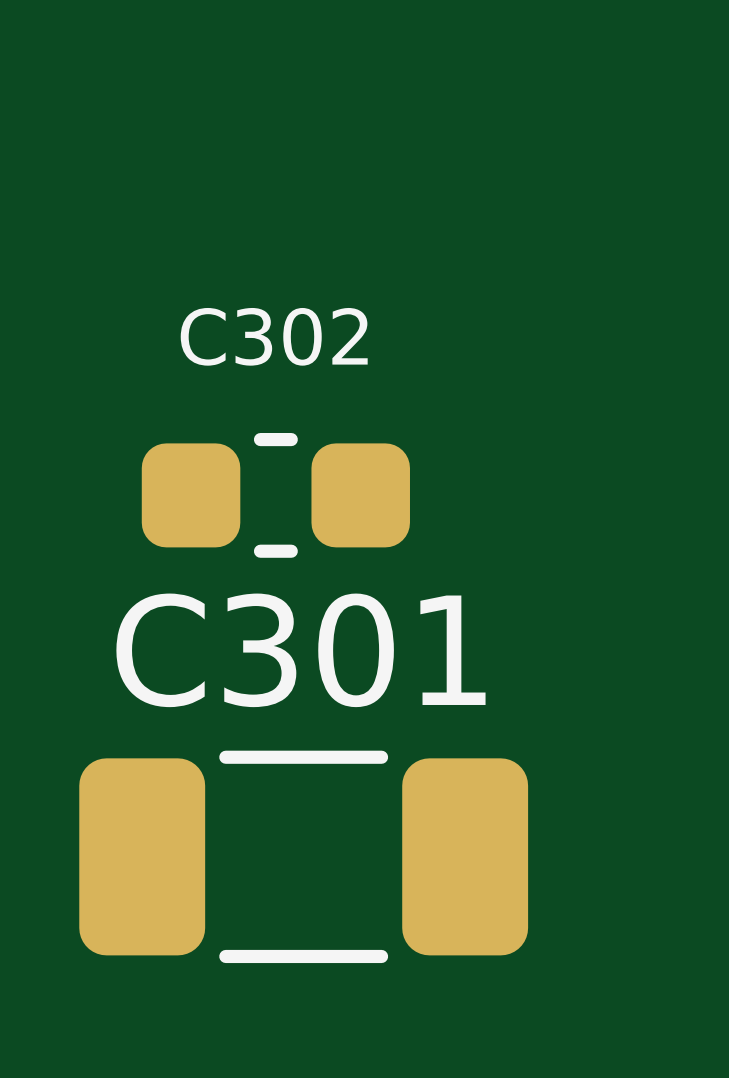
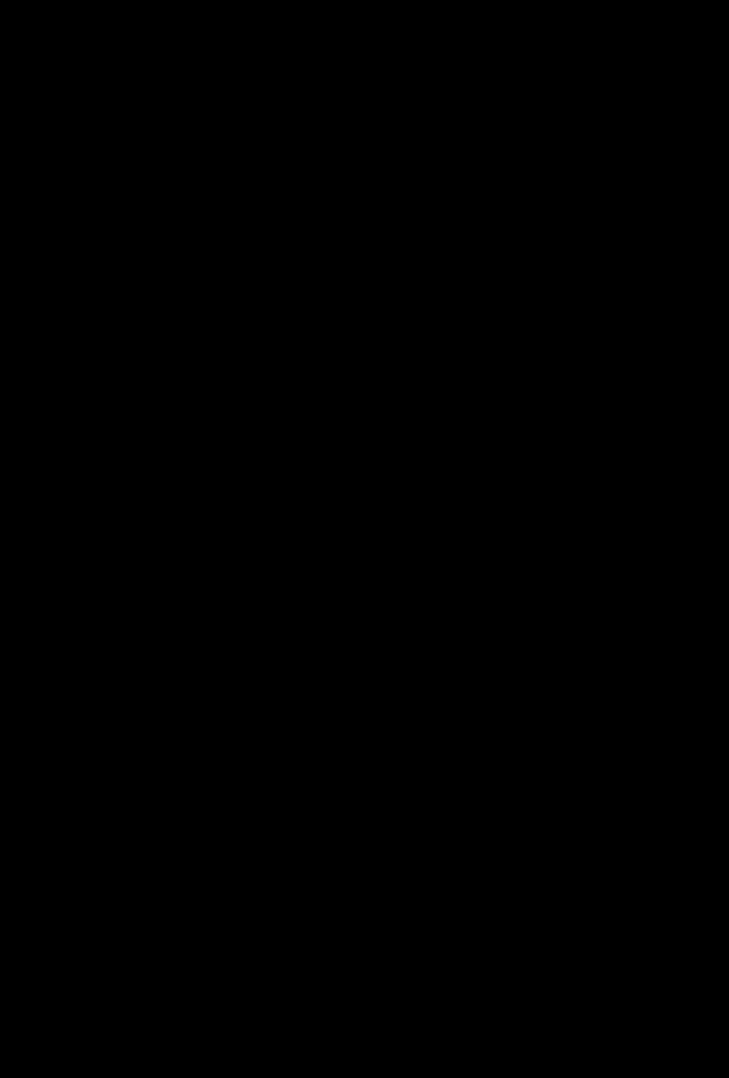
C302: (275, 495) -> none
C301: (303, 856) -> none

